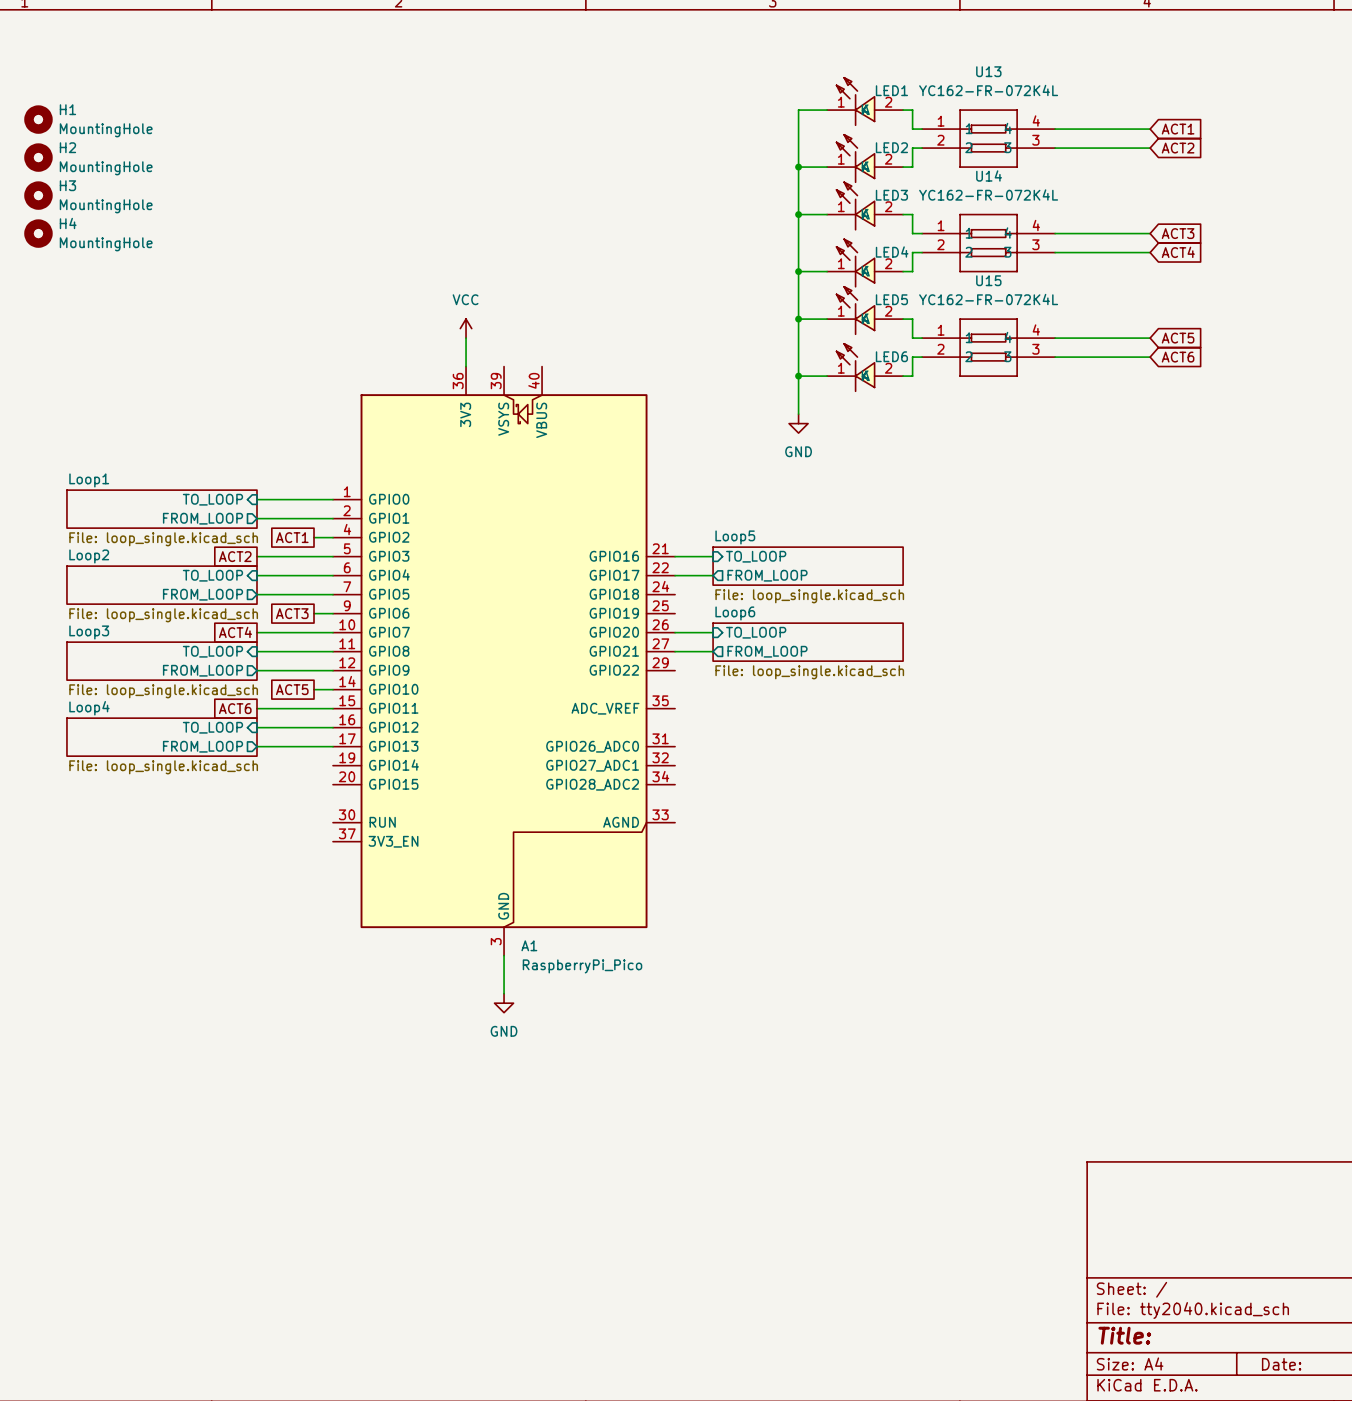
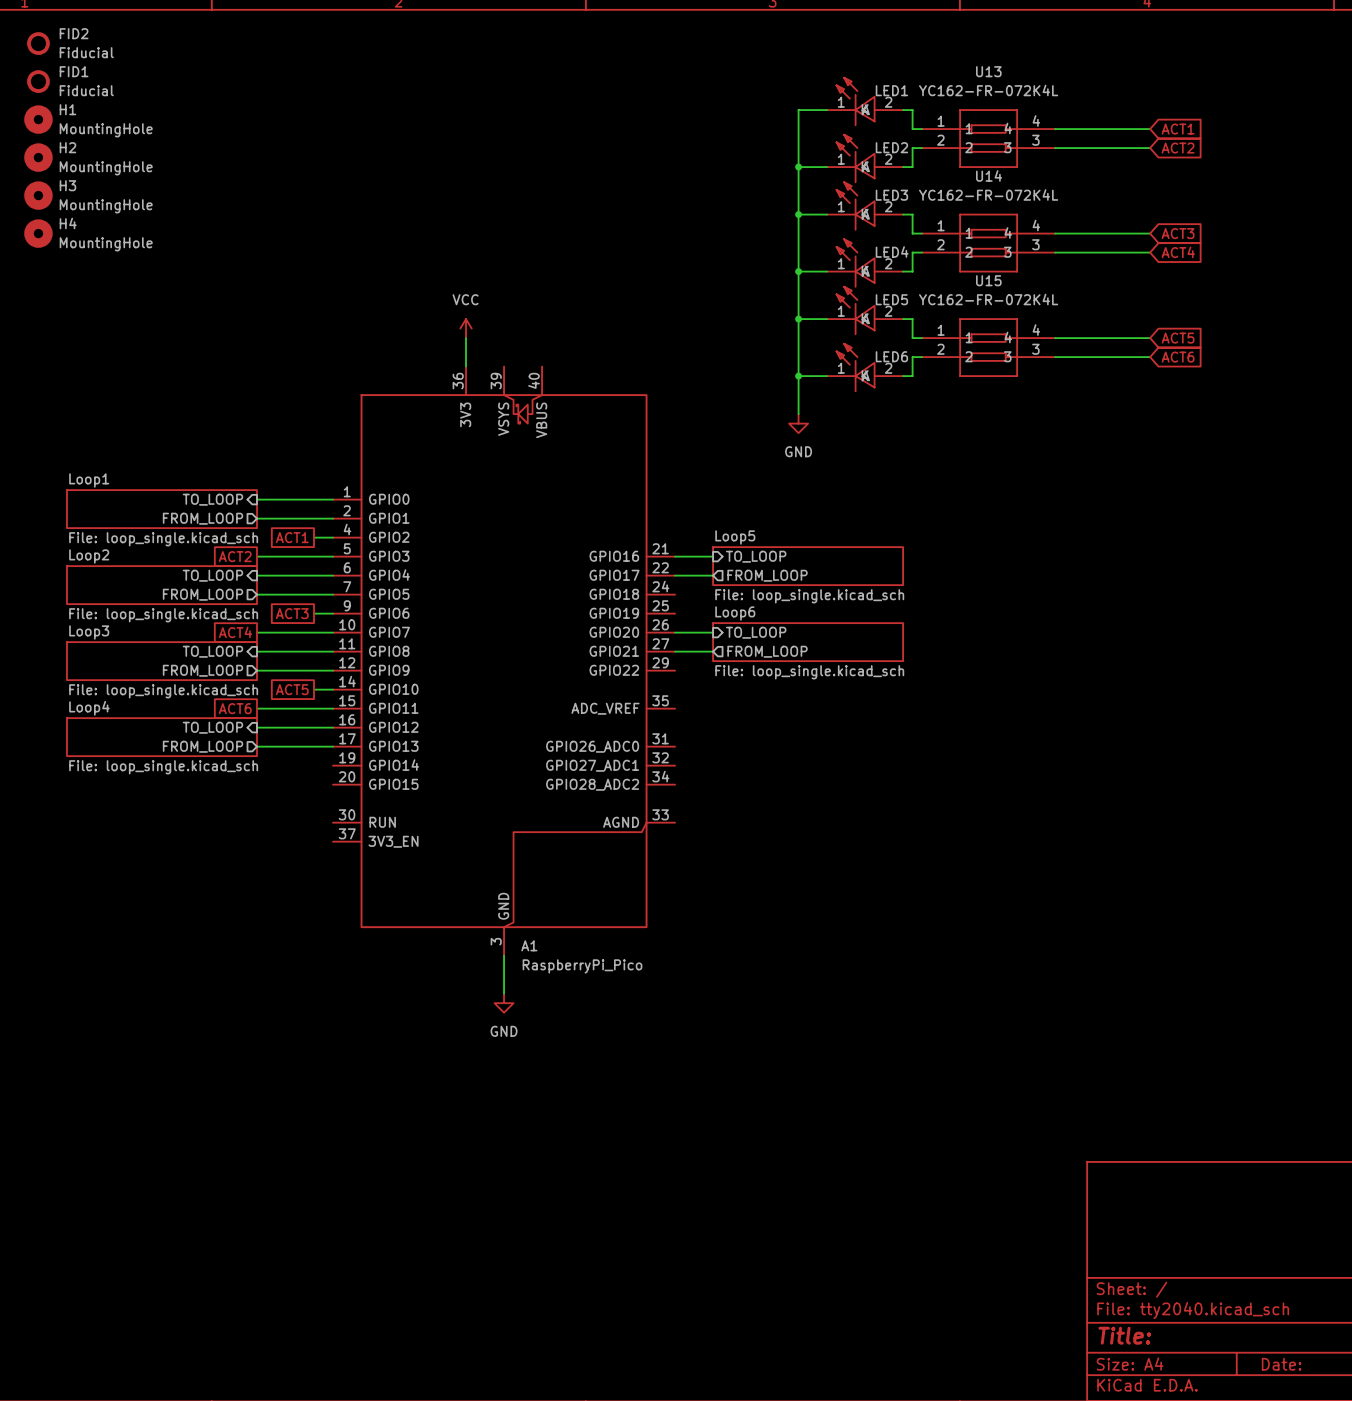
FID2: none -> Fiducial (38, 43)
FID1: none -> Fiducial (38, 81)

